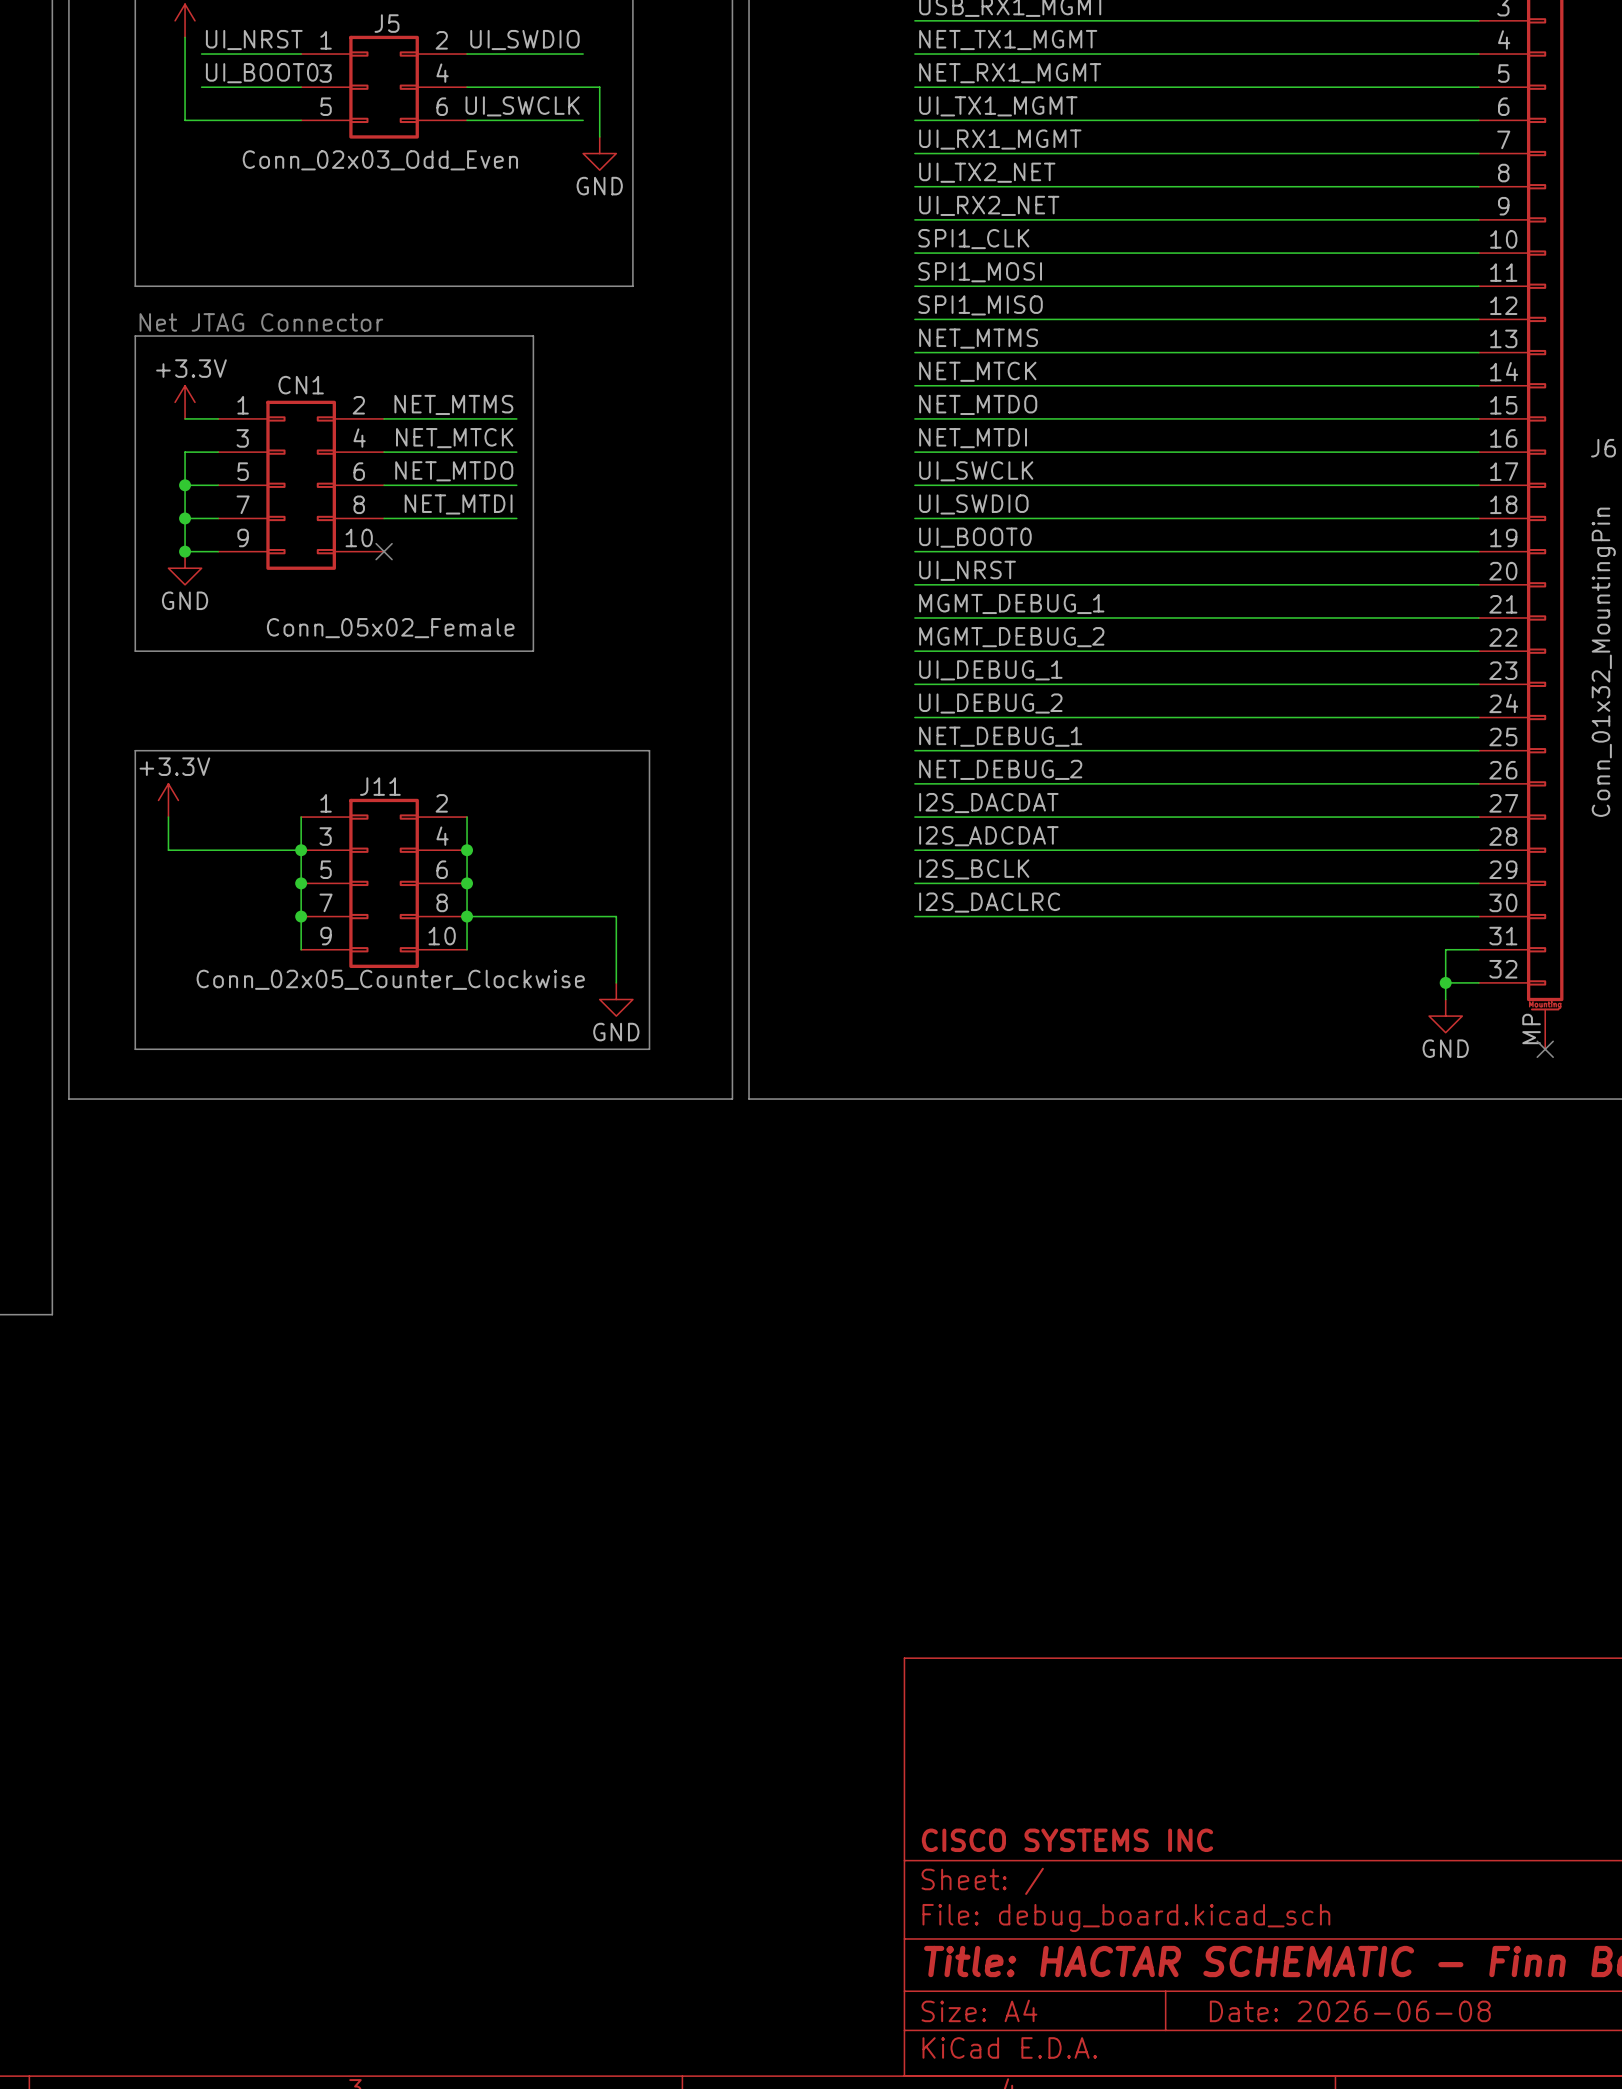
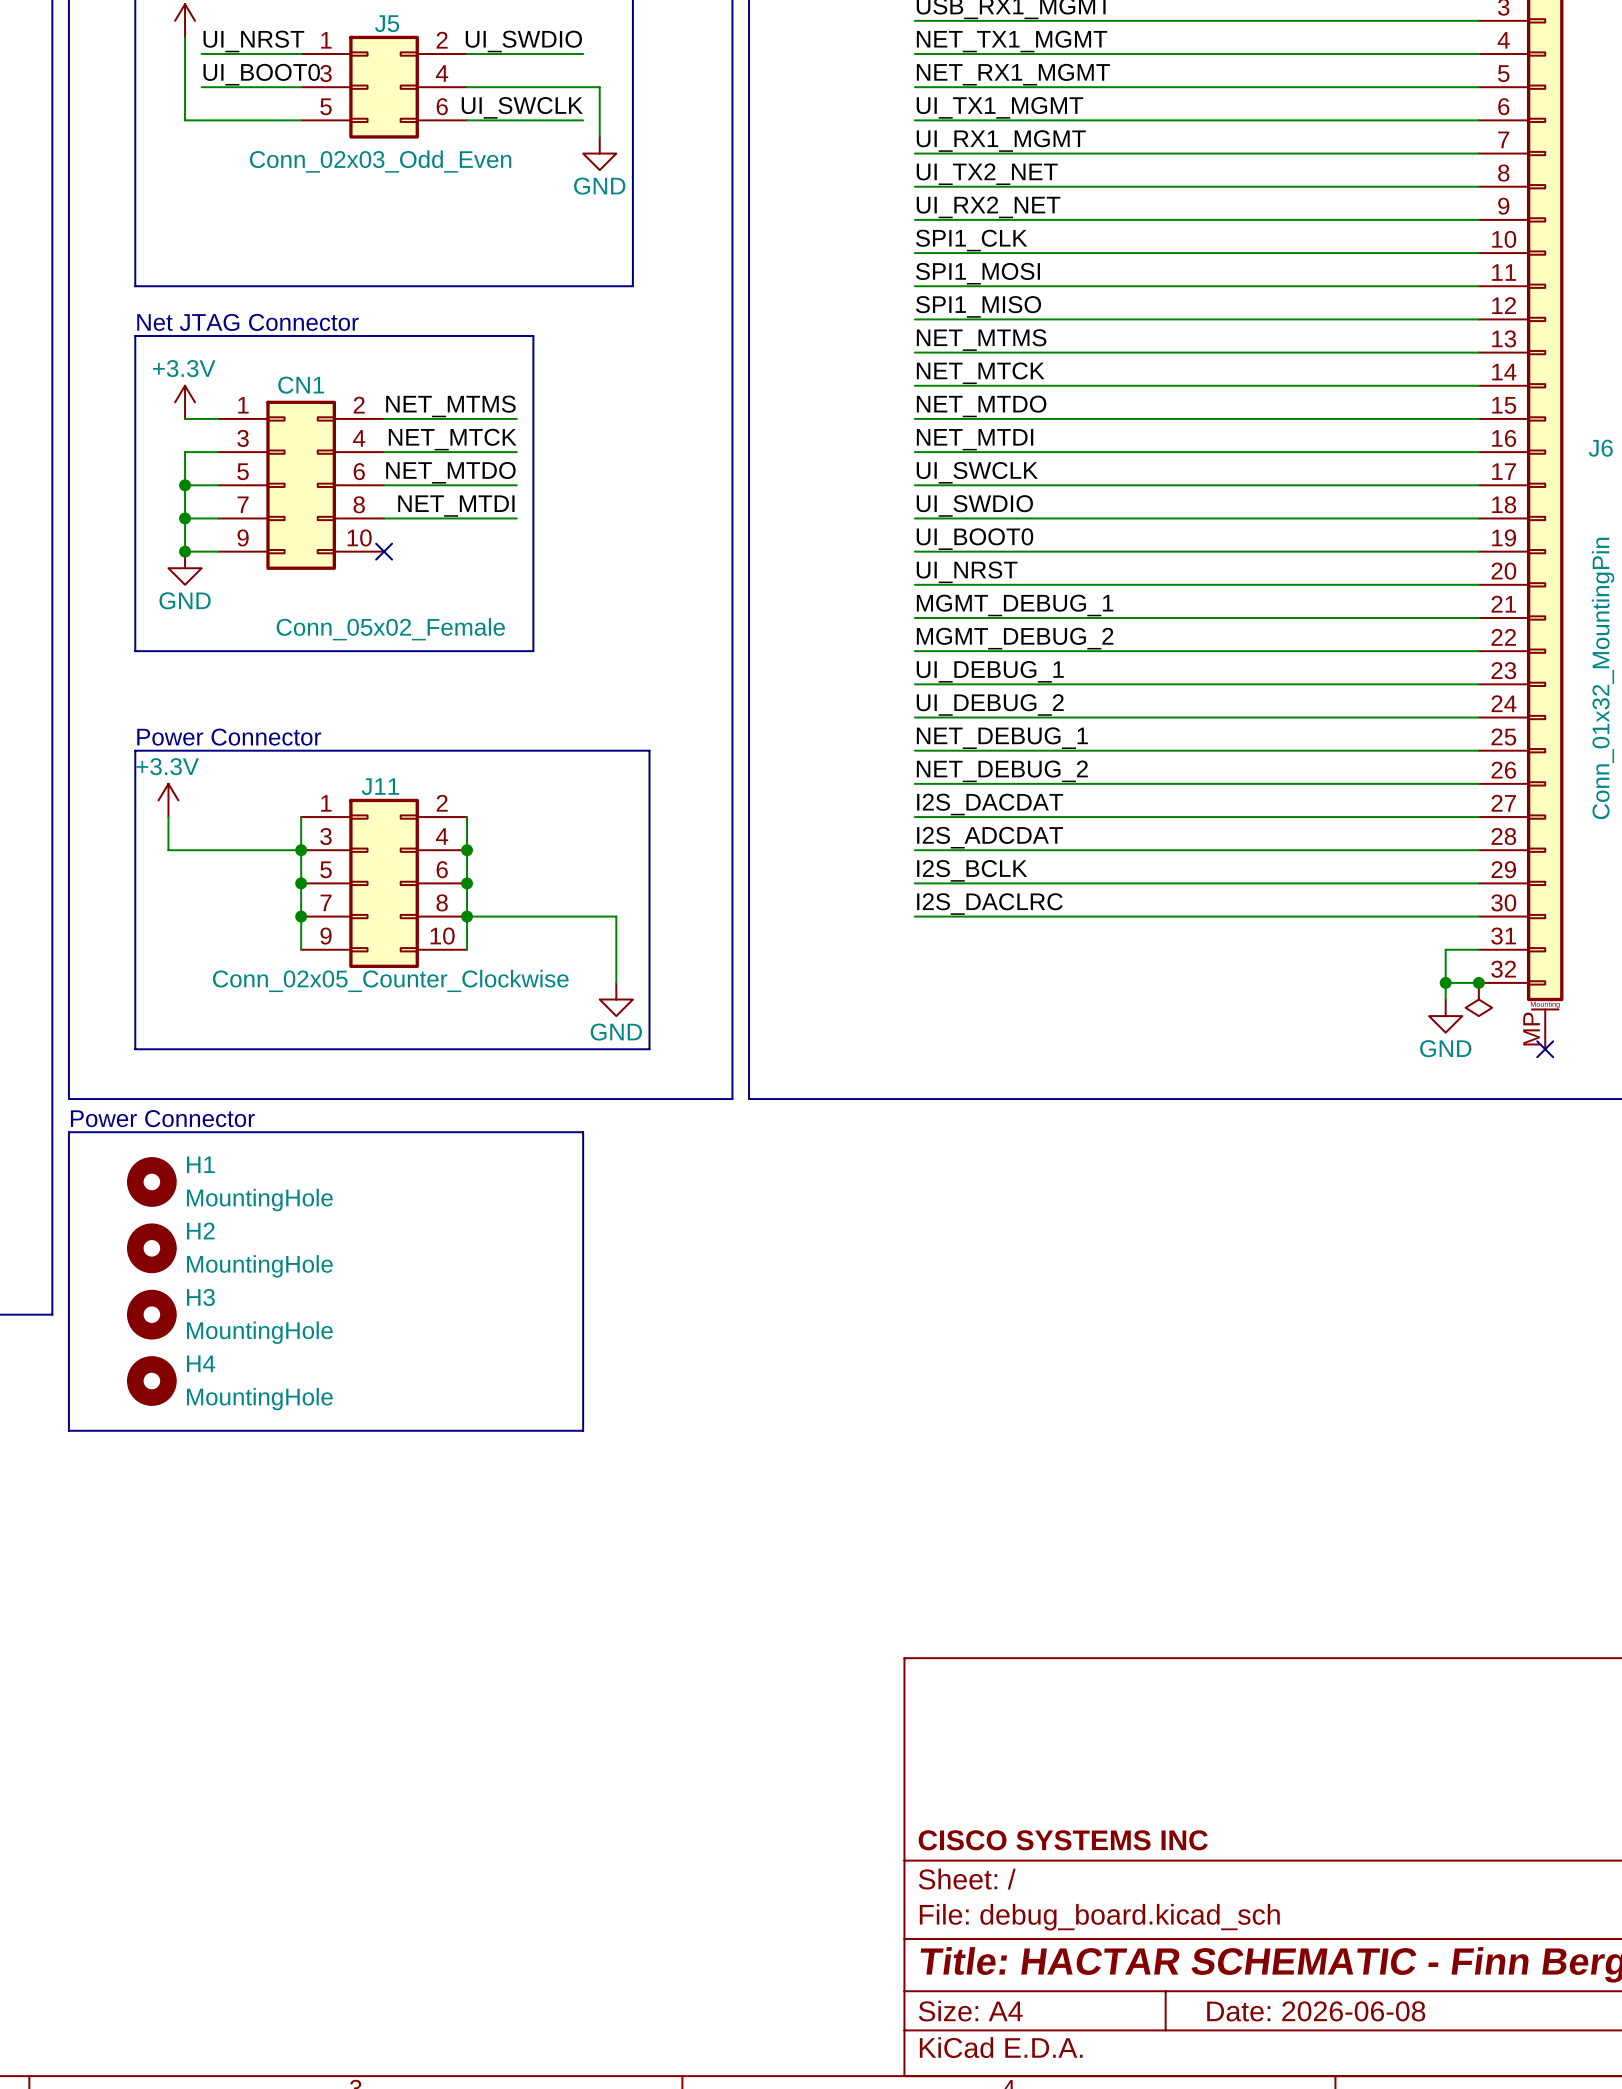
text: none -> Power Connector (229, 737)
junction: none -> (1478, 982)
power symbol: none -> (1478, 999)
text: none -> Power Connector (162, 1118)
line: none -> (68, 1132) (583, 1132) (583, 1430) (68, 1430) (68, 1132)
H1: none -> MountingHole (151, 1181)
H2: none -> MountingHole (151, 1248)
H3: none -> MountingHole (151, 1314)
H4: none -> MountingHole (151, 1381)

